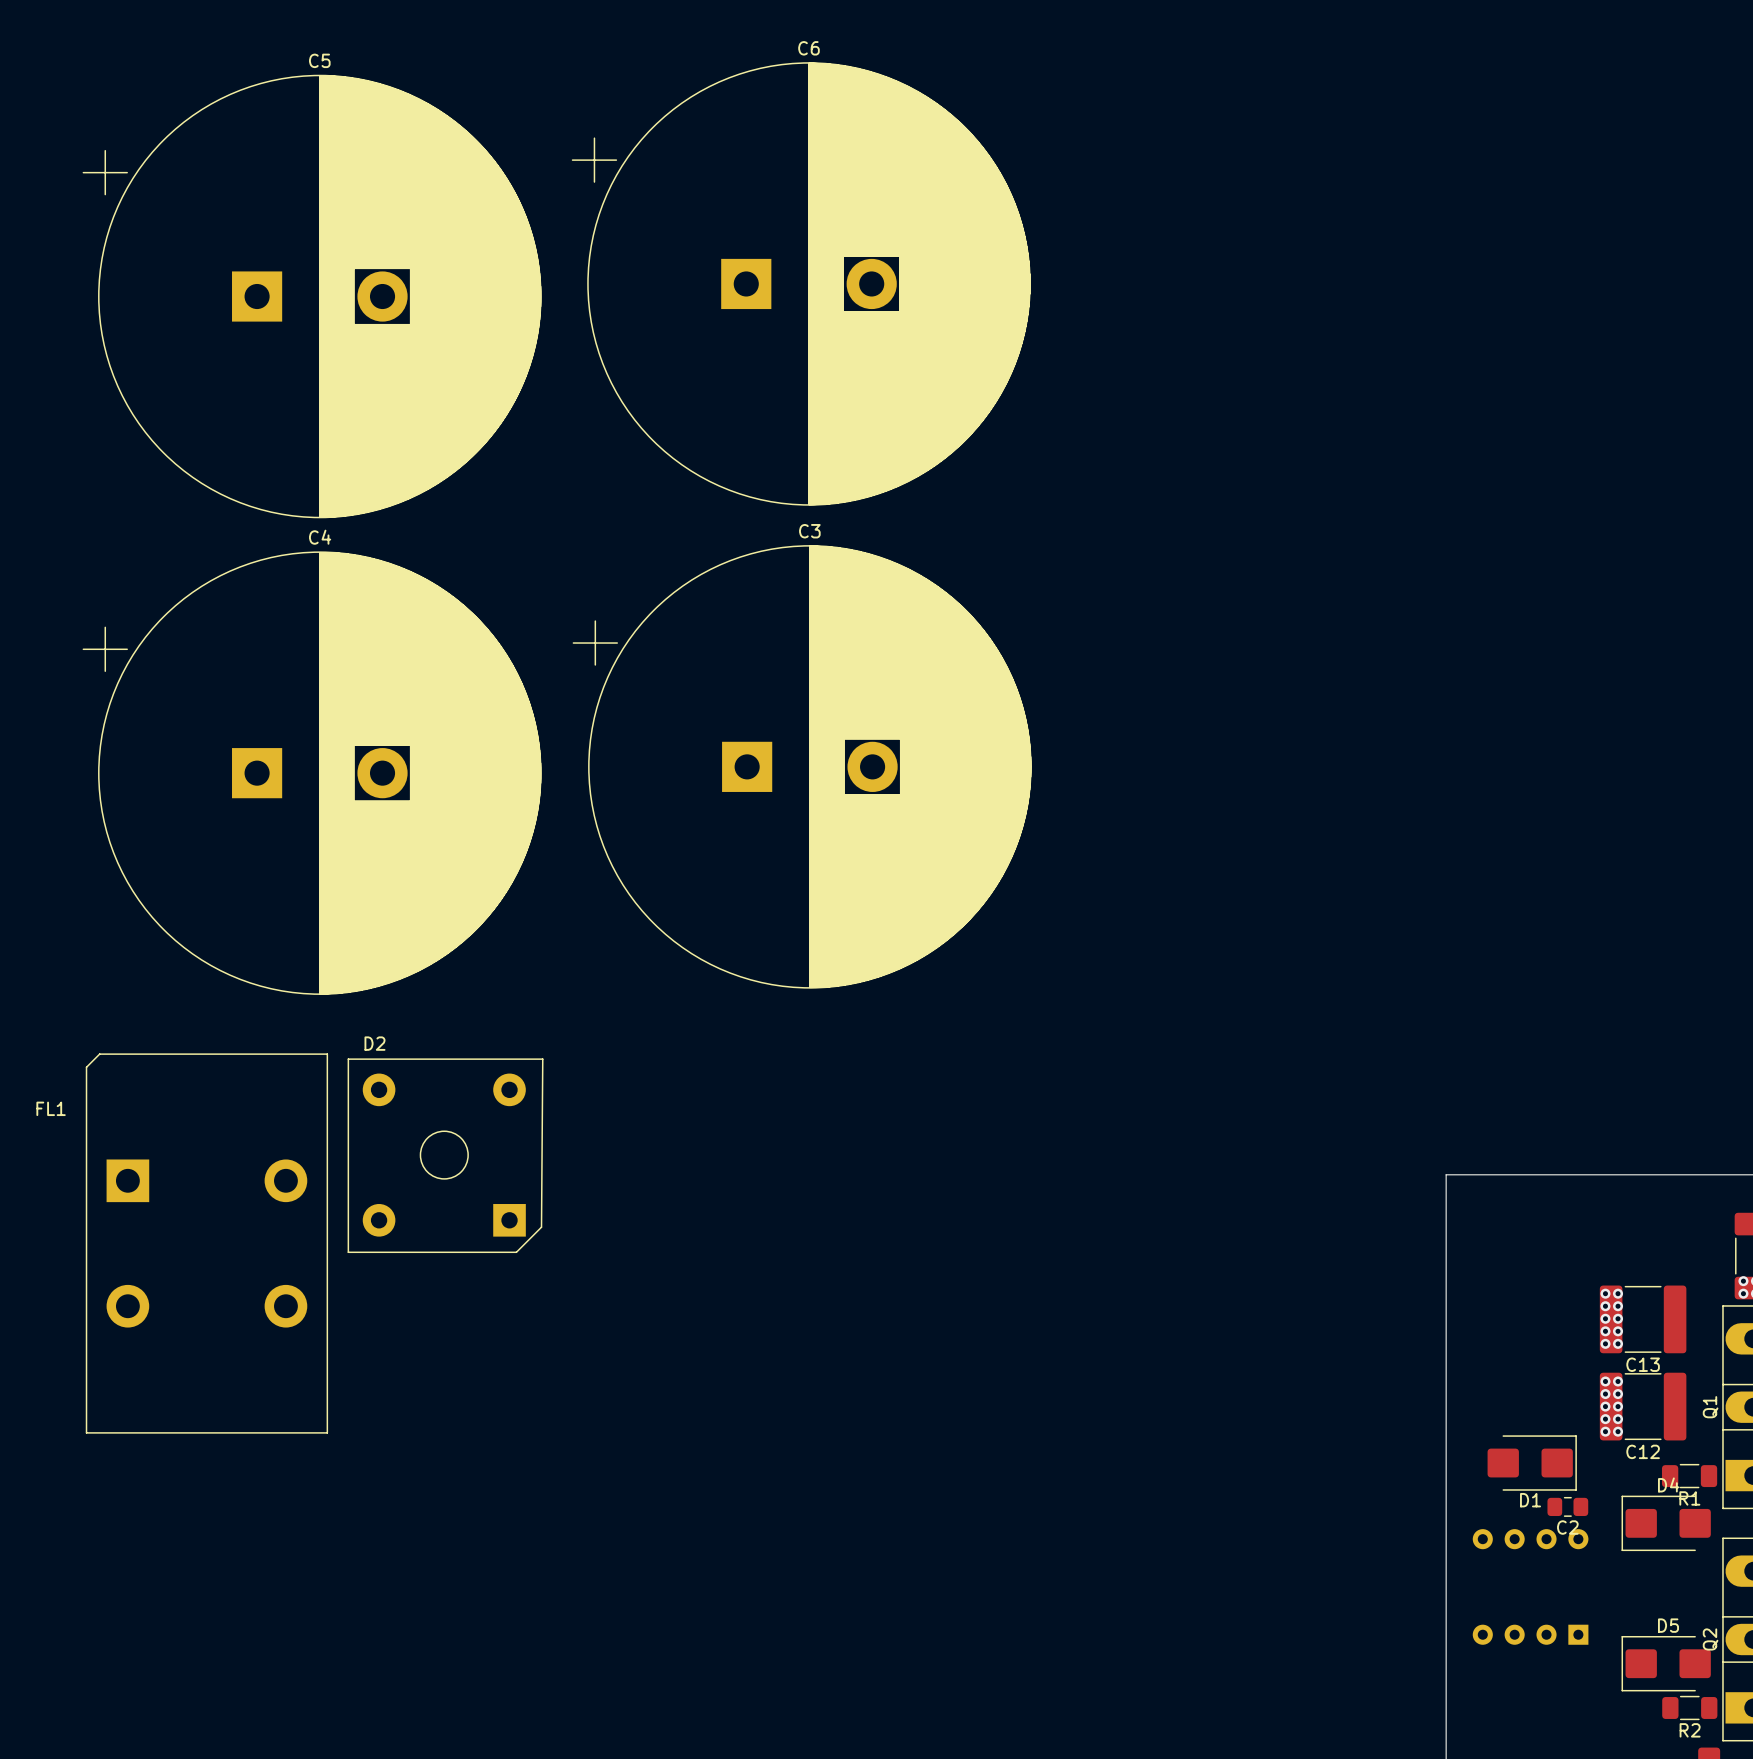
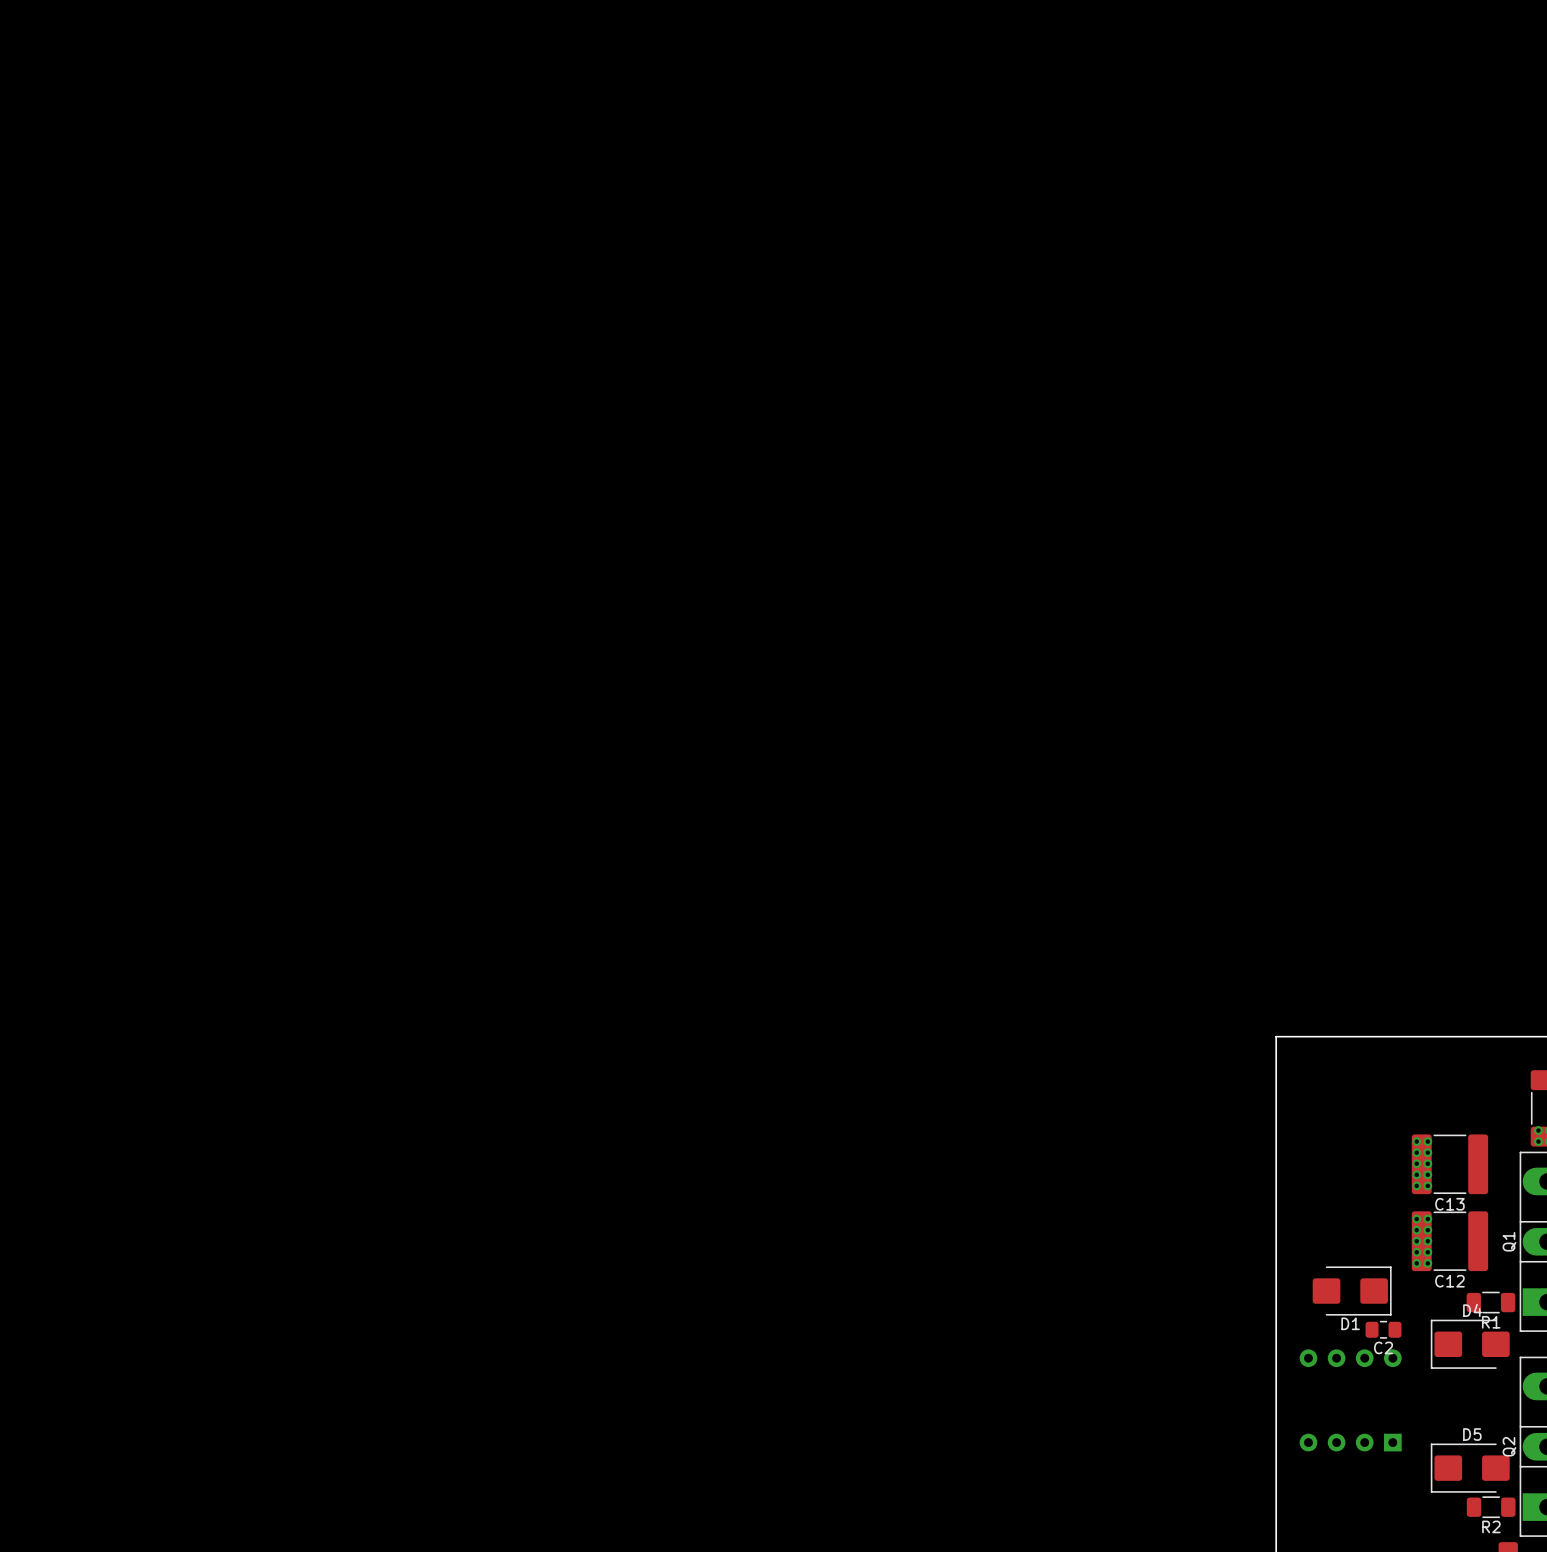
C6: (801, 283) -> none
C5: (312, 296) -> none
C3: (802, 766) -> none
C4: (312, 773) -> none
D2: (445, 1155) -> none
FL1: (206, 1243) -> none

